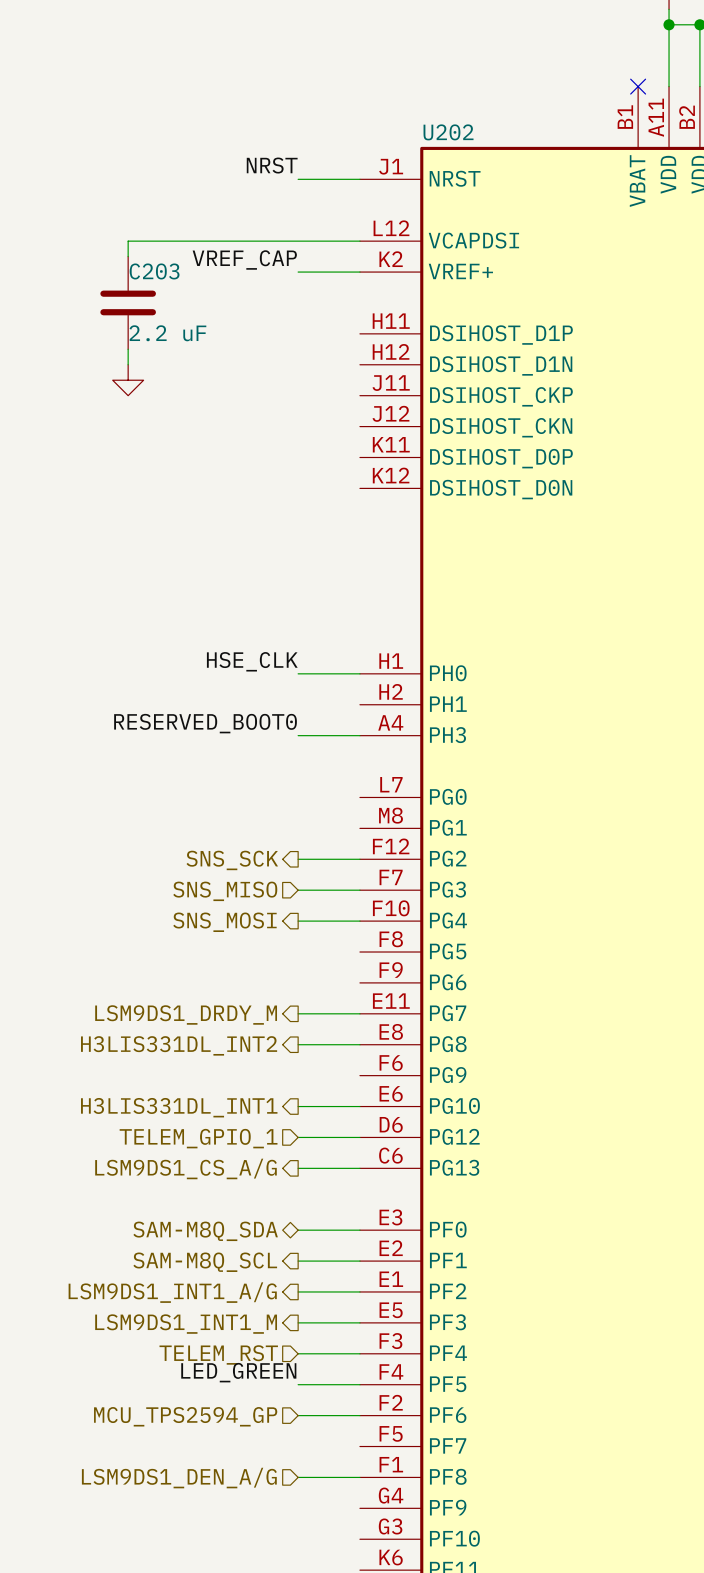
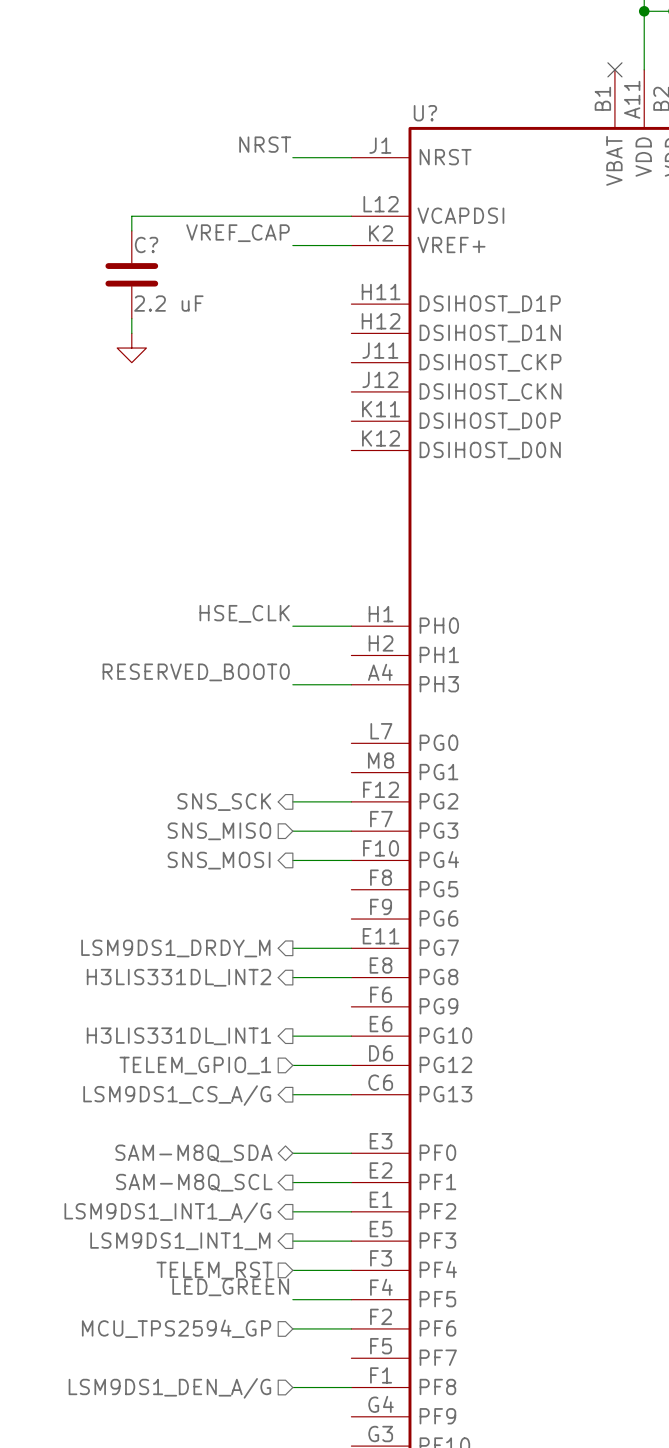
U202 name: U202 (448, 132) -> U? (425, 113)
C203 name: C203 (154, 271) -> C? (146, 244)

